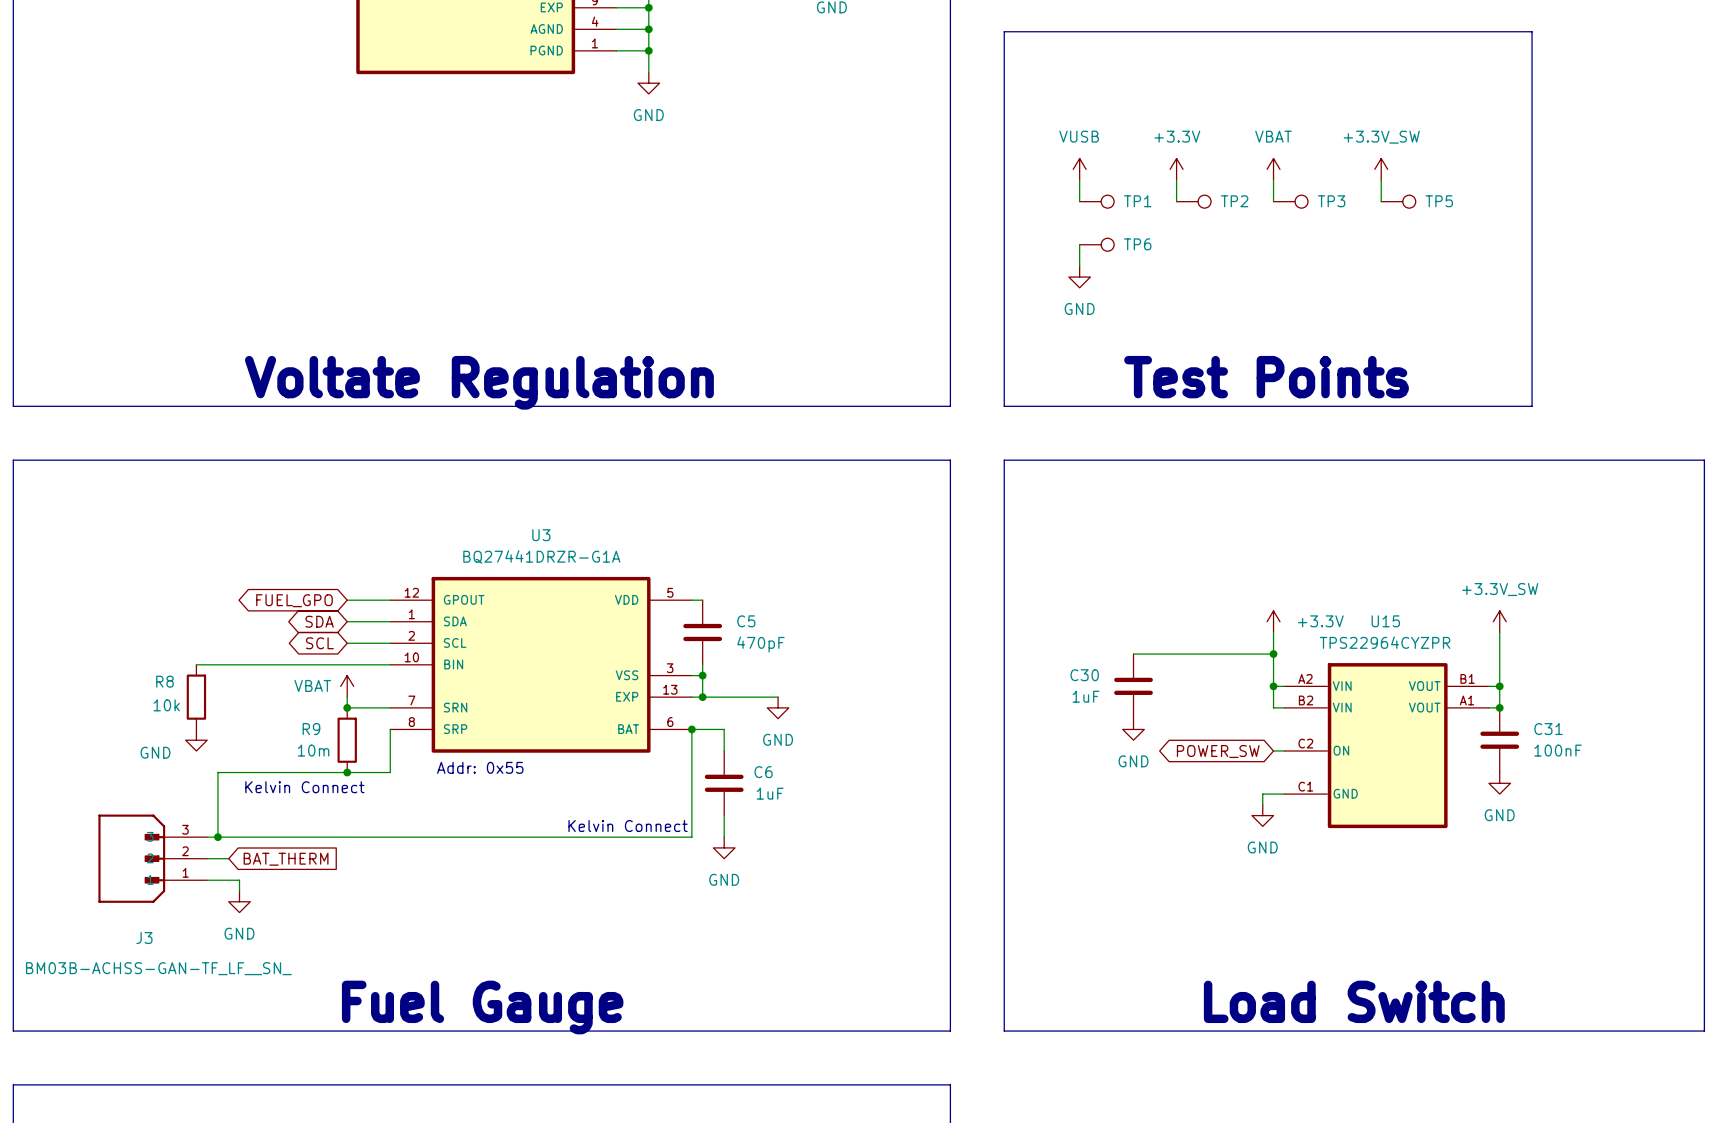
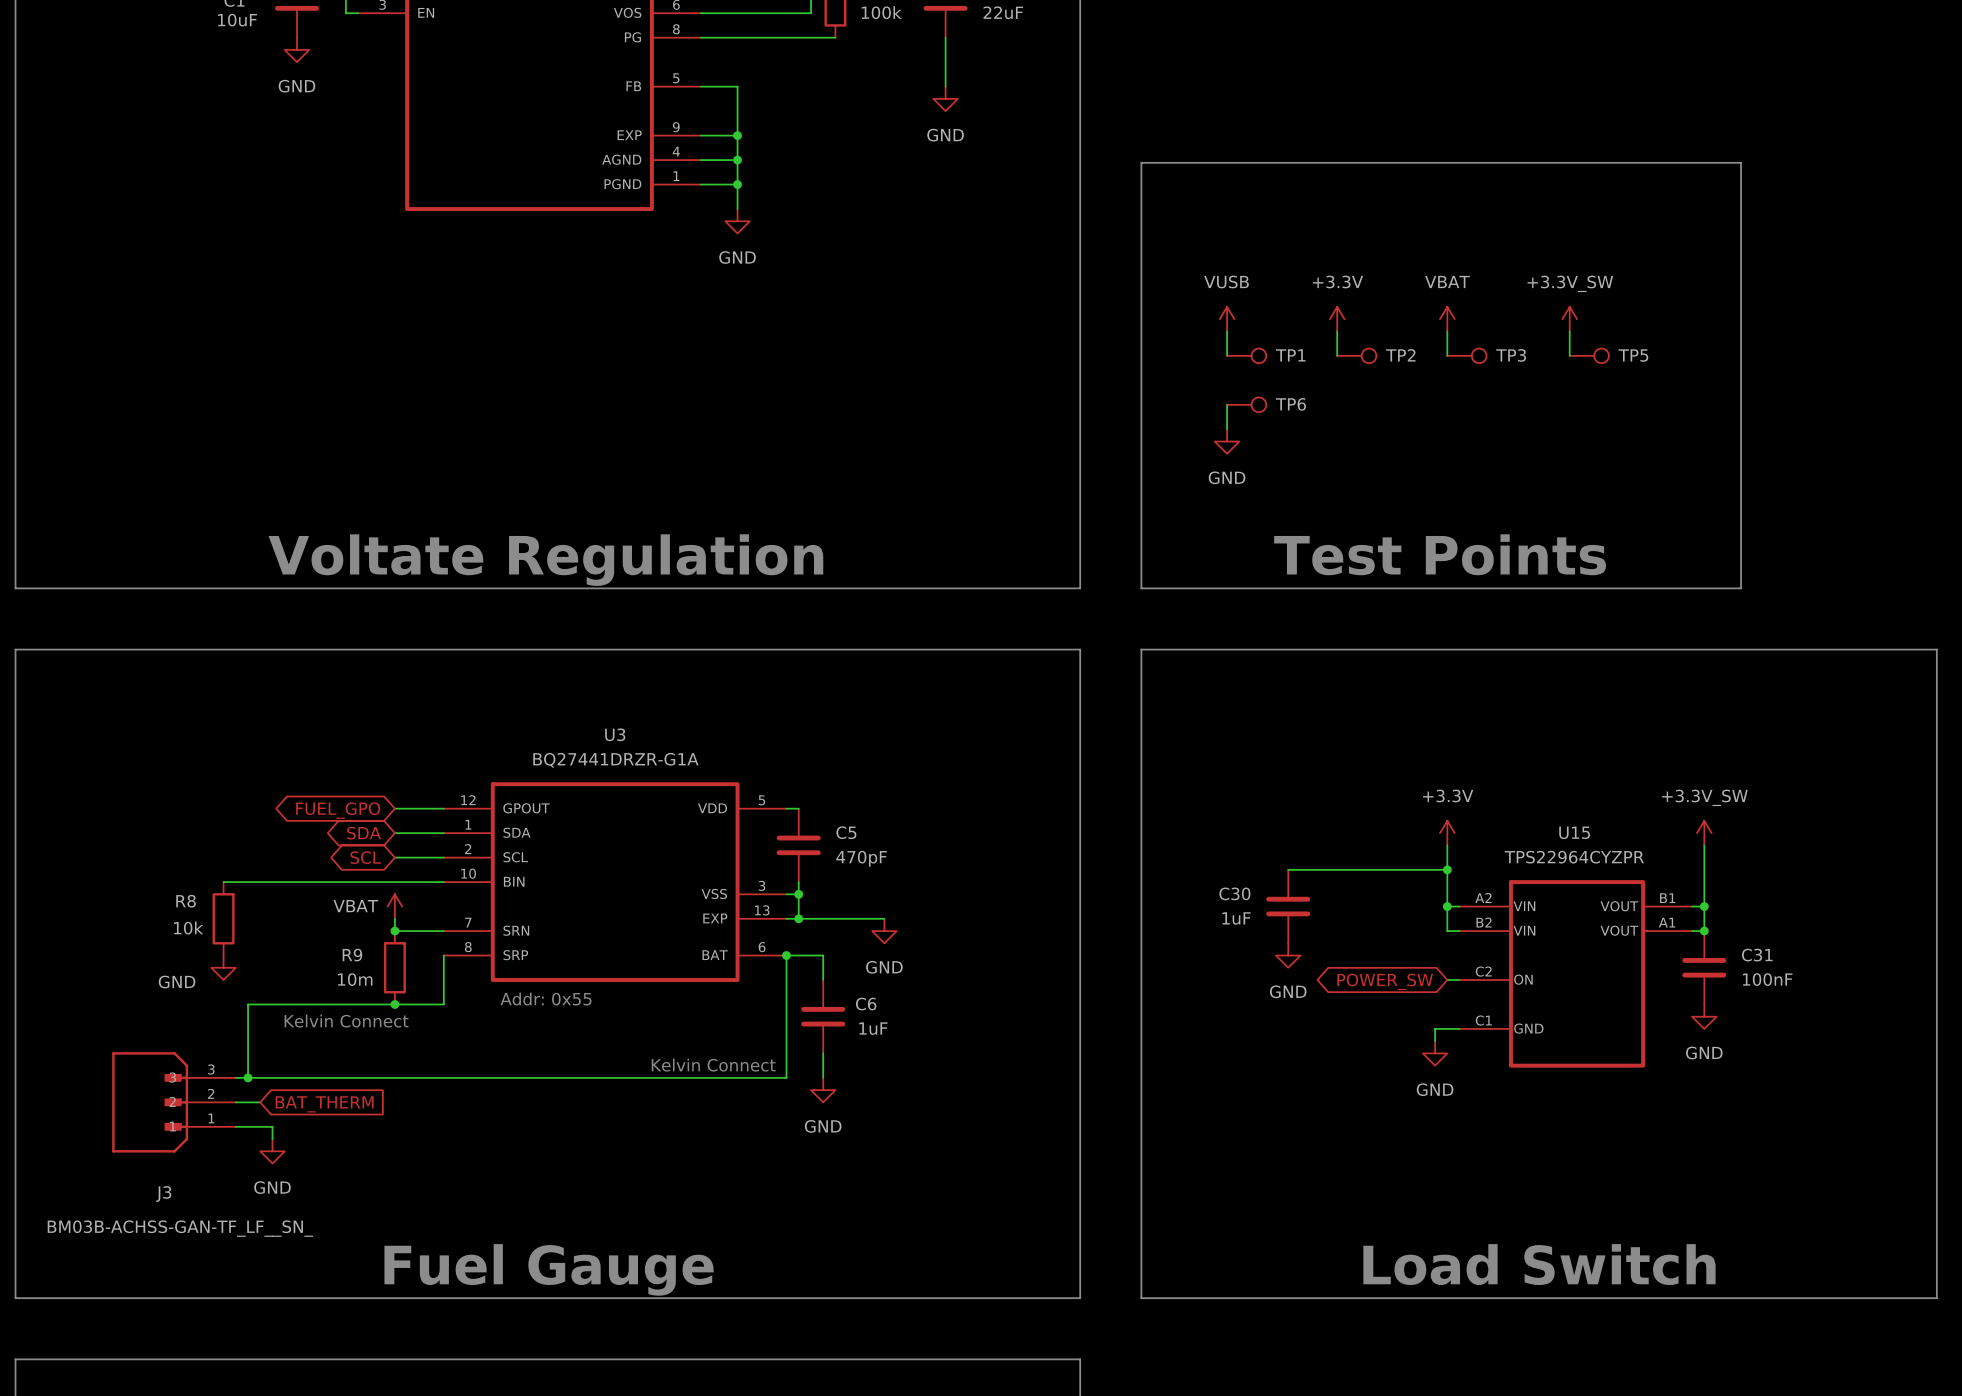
power symbol text position: +3.3V (1320, 621) -> +3.3V (1448, 795)

